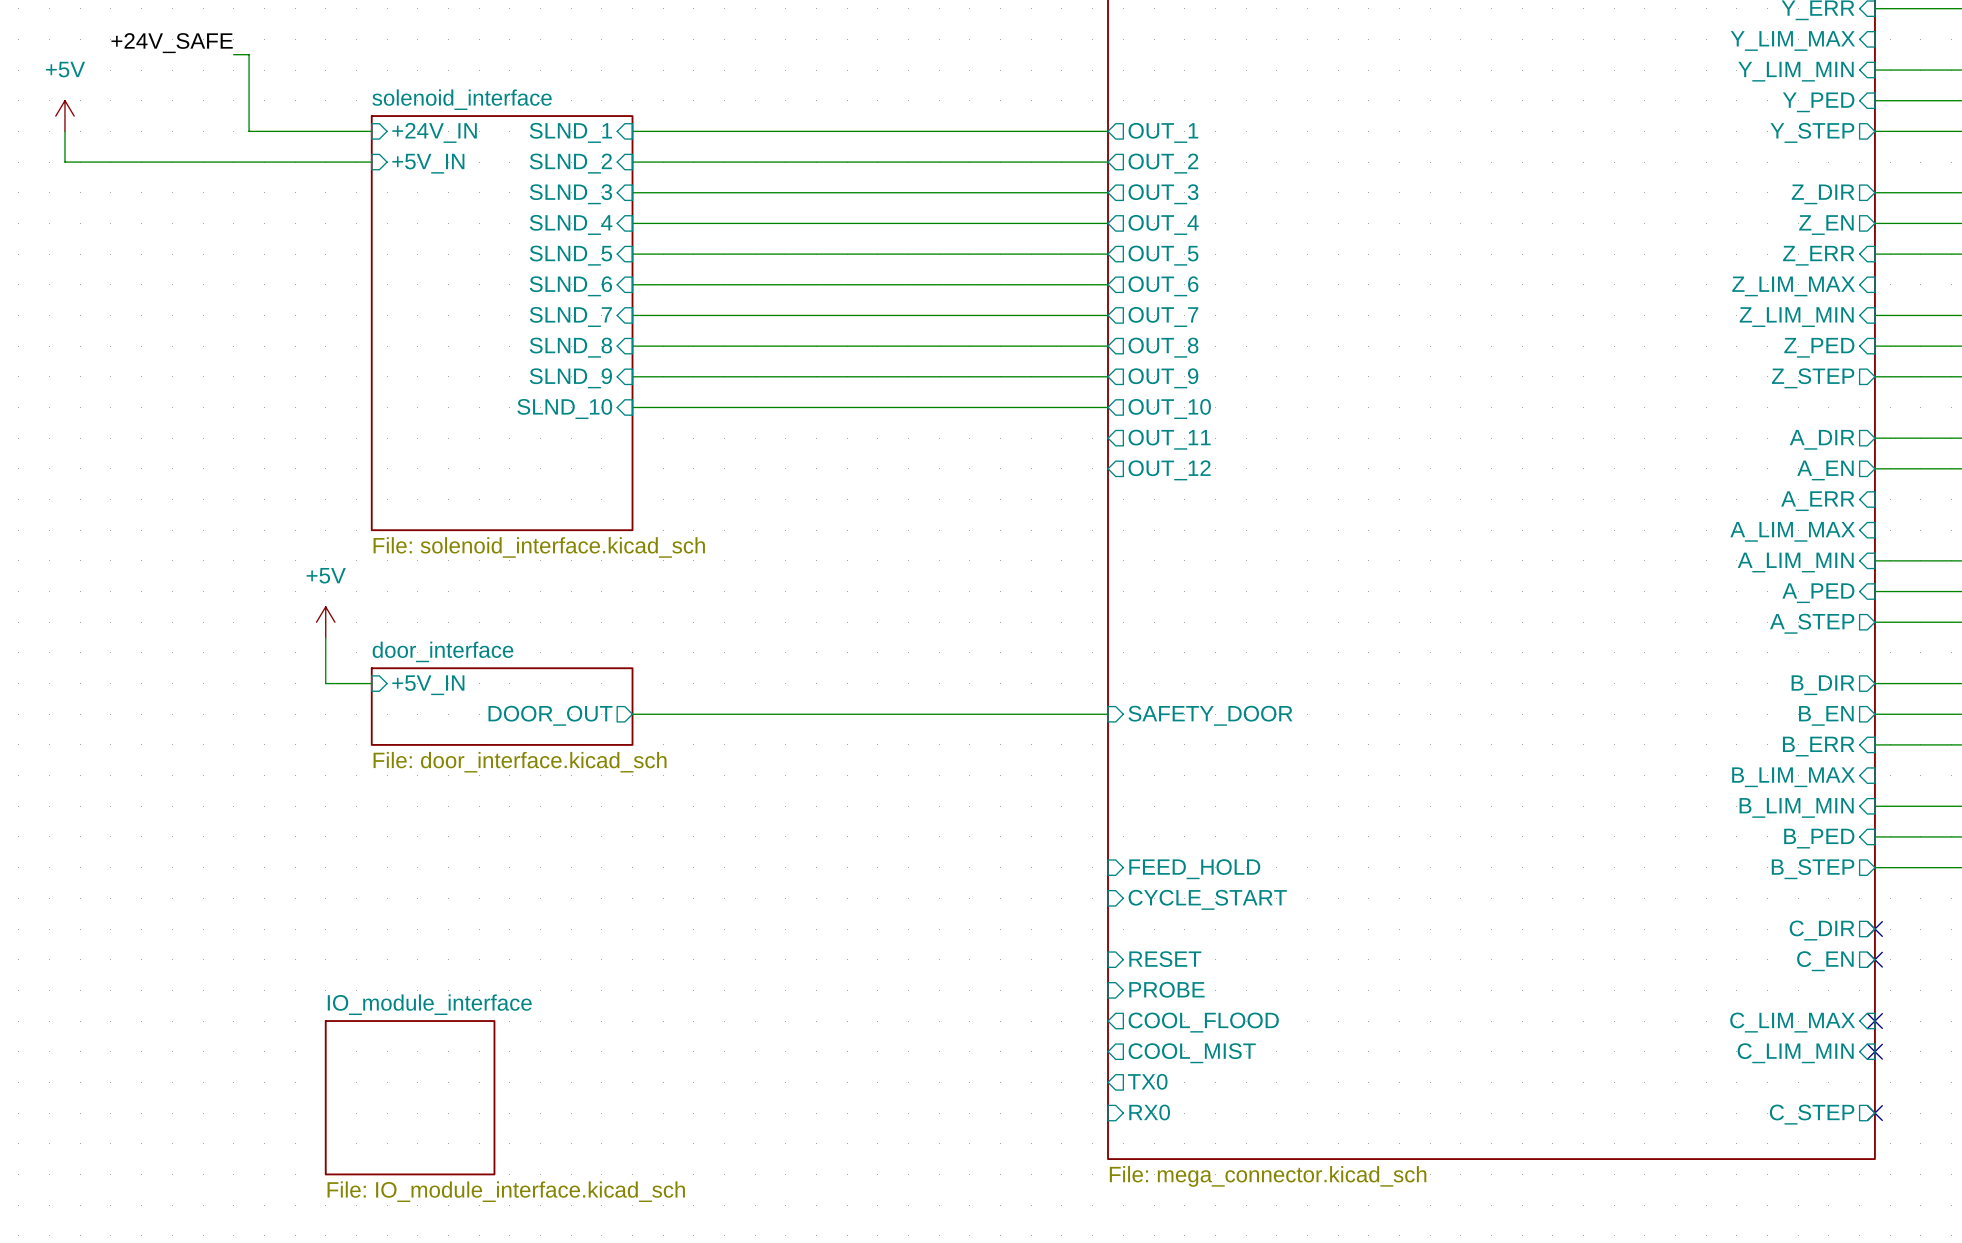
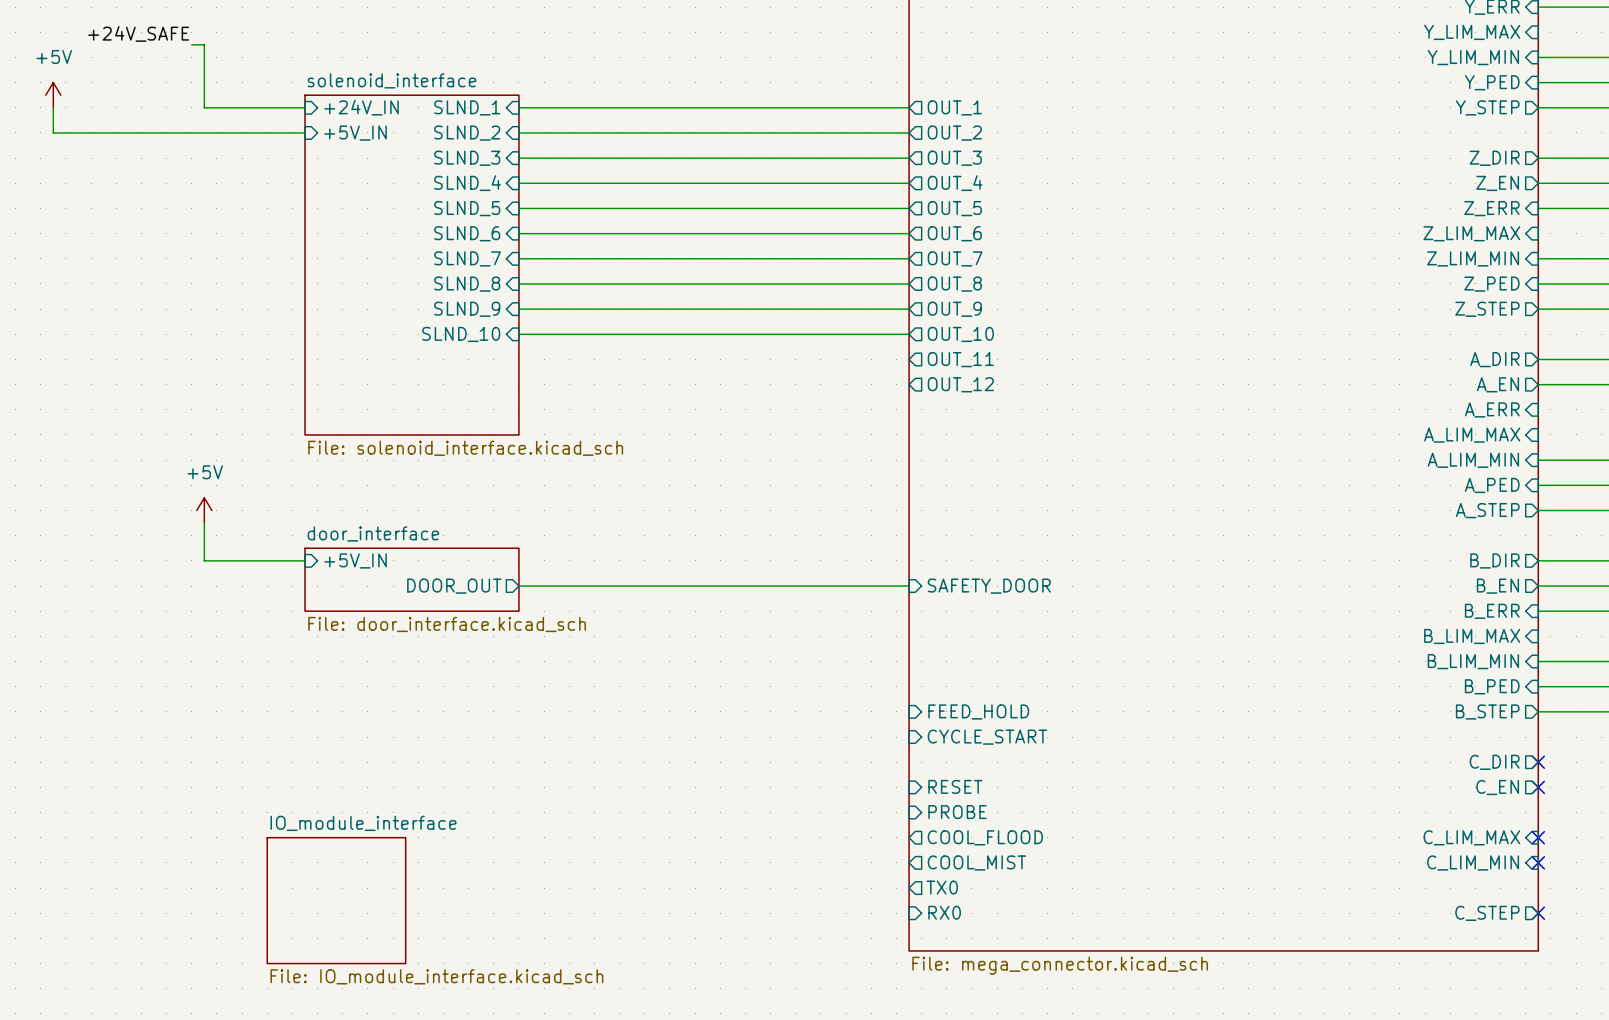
power symbol position: +5V (325, 622) -> +5V (204, 510)
wire: (325, 637) (325, 683) -> (204, 523) (204, 560) (267, 560)

